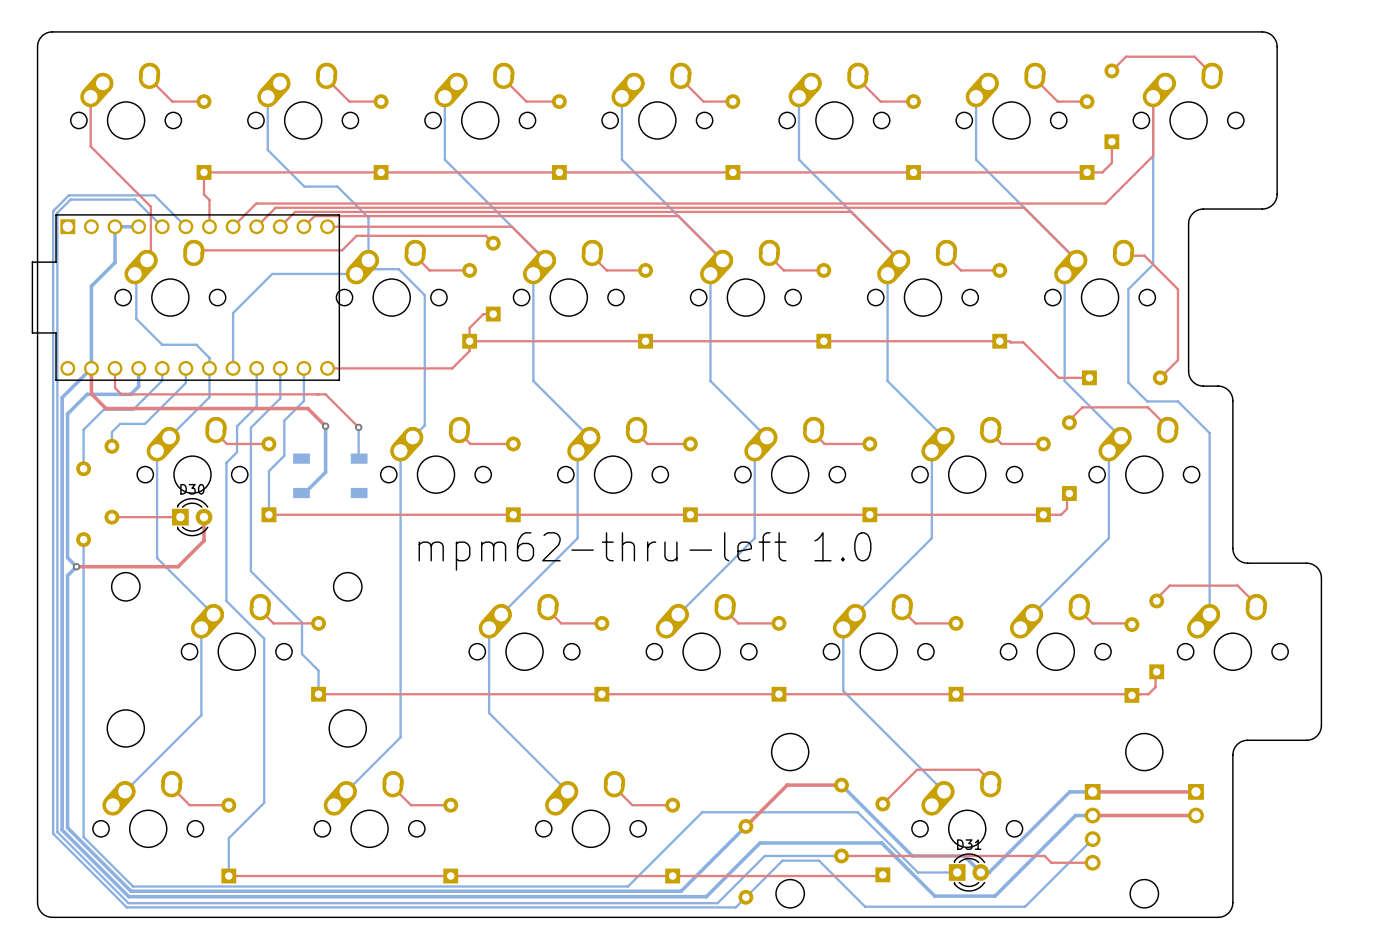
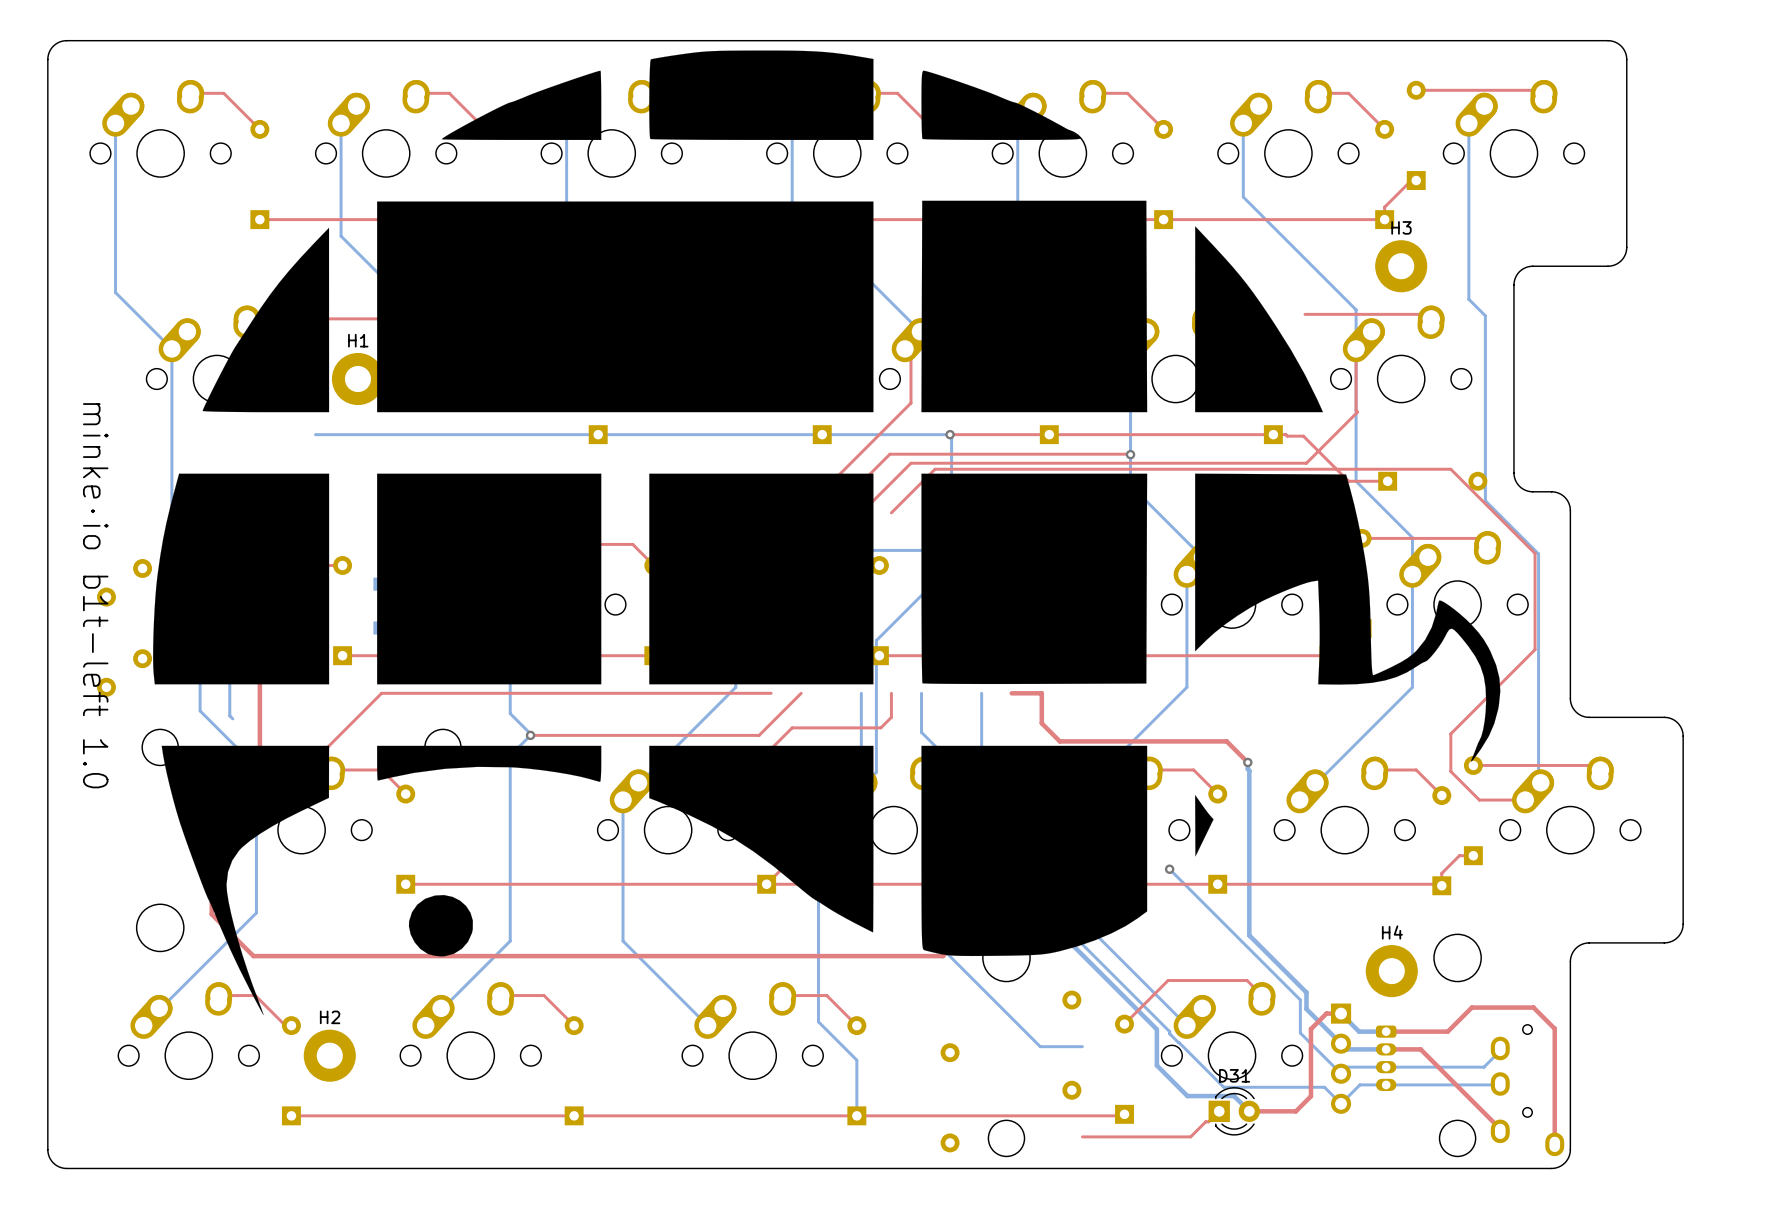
drawing: none -> [153, 50, 1501, 1016]
top track: (1111, 70) (1126, 56) (1194, 56) (1211, 74) (1211, 78) -> (1416, 90) (1541, 90) (1544, 93)
top track: (149, 78) (172, 101) (204, 101) -> (190, 93) (223, 93) (259, 129)
top track: (326, 78) (349, 101) (381, 101) -> (416, 93) (449, 93) (485, 129)
top track: (680, 78) (703, 101) (732, 101) -> (867, 93) (897, 93) (933, 129)
top track: (857, 78) (880, 101) (913, 101) -> (1092, 93) (1127, 93) (1163, 129)
top track: (1034, 78) (1057, 101) (1087, 101) -> (1318, 93) (1348, 93) (1384, 129)
top track: (90, 96) (90, 146) (150, 206) (150, 256) (147, 260) -> none
top track: (1153, 96) (1153, 155) (1105, 203) (256, 203) (233, 226) -> none
top track: (1111, 141) (1111, 162) (1102, 172) (1087, 172) -> (1416, 180) (1411, 180) (1384, 207) (1384, 219)
bottom track: (267, 149) (304, 186) (337, 186) (368, 217) (368, 260) -> (341, 191) (341, 236) (453, 348)
bottom track: (976, 154) (976, 159) (1076, 260) -> (1243, 197) (1356, 309) (1356, 348)
top track: (204, 172) (204, 194) (209, 200) (209, 226) -> none
H3: none -> (1401, 266)
bottom track: (138, 226) (115, 226) (115, 262) (91, 286) (91, 368) (62, 397) (62, 830) (128, 896) (706, 896) (760, 842) (881, 842) (934, 896) (994, 896) (1075, 815) (1092, 815) -> none
bottom track: (162, 226) (135, 199) (70, 199) (57, 212) (57, 832) (128, 903) (717, 903) (764, 855) (841, 855) -> none
bottom track: (185, 226) (154, 195) (68, 195) (53, 211) (53, 833) (126, 907) (735, 907) (782, 860) (819, 860) (865, 906) (1025, 906) (1092, 839) -> none
top track: (256, 226) (275, 207) (1024, 207) (1076, 260) -> none
top track: (280, 226) (295, 211) (851, 211) (899, 260) -> none
top track: (303, 226) (314, 216) (678, 216) (722, 260) -> none
top track: (327, 226) (511, 226) (545, 260) -> none
bottom track: (1153, 234) (1153, 264) (1128, 289) (1128, 382) (1147, 401) (1177, 401) (1209, 433) (1209, 615) (1207, 617) -> (1468, 299) (1485, 315) (1485, 500) (1538, 553) (1538, 786)
top track: none -> (1304, 314) (1426, 314) (1431, 318)
top track: (1123, 255) (1144, 255) (1177, 289) (1177, 360) (1160, 377) -> none
bottom track: (134, 273) (136, 318) (162, 344) (196, 344) (209, 357) (209, 397) (157, 451) -> (115, 123) (115, 292) (171, 348) (171, 546) (200, 574)
bottom track: (533, 273) (533, 381) (589, 437) -> none
bottom track: (710, 273) (710, 381) (766, 437) -> none
top track: none -> (904, 348) (910, 354) (910, 403) (801, 512)
top track: none -> (1356, 348) (1357, 412) (1306, 463) (910, 463) (861, 512)
part: (185, 297) -> none
H1: none -> (357, 379)
top track: (493, 314) (483, 314) (469, 327) (469, 351) (452, 368) (327, 368) -> none
bottom track: none -> (315, 434) (950, 434) (951, 512)
top track: (469, 341) (745, 341) -> none
via: none -> (950, 434)
top track: none -> (1130, 454) (889, 454) (831, 512)
via: none -> (1130, 454)
top track: (91, 368) (91, 393) (106, 408) (307, 408) (325, 426) -> none
top track: (115, 368) (115, 388) (121, 394) (325, 394) (358, 427) -> none
bottom track: (138, 368) (138, 386) (130, 394) (87, 394) (67, 413) (67, 557) (76, 566) (67, 575) (67, 827) (131, 891) (681, 891) (745, 826) -> none
bottom track: (162, 368) (162, 380) (133, 409) (103, 409) (83, 429) (83, 468) -> none
bottom track: (185, 368) (185, 382) (144, 423) (120, 423) (111, 432) (111, 446) -> none
bottom track: (233, 368) (233, 313) (272, 273) (356, 273) (361, 269) (398, 269) (424, 295) (424, 425) (400, 451) -> none
bottom track: (256, 368) (256, 406) (237, 426) (237, 452) (226, 462) (226, 600) (264, 638) (264, 802) (228, 838) (228, 876) -> none
bottom track: (280, 368) (280, 398) (250, 427) (250, 571) (302, 622) (302, 654) (318, 670) (318, 694) -> none
bottom track: (303, 368) (303, 401) (284, 420) (284, 455) (268, 471) (268, 514) -> none
bottom track: (1064, 377) (1064, 381) (1121, 437) -> (1356, 481) (1412, 537) (1412, 574)
top track: none -> (891, 512) (935, 469) (1450, 469) (1535, 553) (1535, 649) (1450, 733) (1450, 771) (1479, 800) (1525, 800)
top track: (1067, 422) (1082, 407) (1147, 407) (1163, 422) -> (1362, 538) (1481, 538)
via: (325, 426) -> none
via: (358, 427) -> none
top track: (459, 432) (470, 443) (513, 443) -> (585, 544) (632, 544) (653, 565)
top track: (636, 432) (647, 443) (690, 443) -> none
top track: (813, 432) (824, 443) (869, 443) -> none
top track: (990, 432) (1001, 443) (1044, 443) -> none
bottom track: (754, 451) (754, 538) (666, 628) -> (801, 512) (814, 526) (820, 526) (844, 550) (937, 550) (961, 574) (942, 574) (876, 640) (876, 772) (848, 800)
text: none -> minke·io b1t-left 1.0 (95, 595)
top track: (111, 517) (180, 517) -> none
bottom track: none -> (229, 658) (229, 715) (232, 718)
bottom track: (577, 538) (501, 614) -> (735, 685) (623, 800)
bottom track: (931, 538) (855, 614) -> (1186, 685) (1074, 800)
bottom track: (1108, 538) (1032, 614) -> (1412, 685) (1299, 800)
bottom track: (83, 539) (83, 837) (133, 886) (628, 886) (702, 812) (857, 812) (917, 872) (957, 872) -> none
top track: (204, 540) (178, 566) (76, 566) -> (259, 688) (259, 747) (211, 795) (211, 914) (253, 956) (942, 956) (990, 908)
top track: none -> (771, 693) (381, 693) (275, 800) (256, 800)
top track: none -> (801, 693) (759, 735) (530, 735)
bottom track: none -> (861, 693) (861, 747) (818, 790) (818, 1021) (856, 1060) (856, 1115)
top track: none -> (891, 693) (891, 717) (880, 727) (792, 727) (771, 748) (771, 766) (796, 792) (796, 855) (766, 884)
bottom track: none -> (921, 693) (921, 732) (946, 757) (946, 782) (933, 795) (933, 939) (1040, 1046) (1082, 1046)
bottom track: none -> (981, 693) (981, 775) (1025, 818) (1025, 887) (1223, 1087) (1324, 1087) (1341, 1103) (1359, 1084) (1500, 1083)
top track: none -> (1011, 693) (1041, 693) (1041, 723) (1059, 741) (1226, 741) (1247, 762)
text: mpm62-thru-left 1.0 (645, 551) -> none
bottom track: (400, 560) (400, 593) -> (510, 713) (532, 735) (510, 755)
via: (76, 566) -> none
via: none -> (530, 735)
bottom track: none -> (1247, 762) (1249, 935) (1306, 992) (1306, 1009) (1346, 1049) (1380, 1049)
via: none -> (1247, 762)
top track: (1155, 599) (1169, 585) (1237, 585) (1252, 600) -> (1473, 765) (1595, 765)
top track: none -> (1374, 769) (1416, 769) (1441, 795)
top track: (260, 609) (273, 623) (318, 623) -> (331, 769) (381, 769) (405, 794)
top track: (724, 609) (738, 623) (778, 623) -> none
top track: (901, 609) (915, 623) (956, 623) -> (1149, 769) (1193, 769) (1217, 794)
top track: (1079, 609) (1092, 623) (1133, 623) -> none
top track: (1155, 670) (1155, 687) (1148, 694) (1130, 694) -> (1473, 855) (1459, 855) (1441, 873) (1441, 885) (1440, 884)
bottom track: none -> (1169, 869) (1300, 999) (1300, 1033) (1341, 1073) (1347, 1067) (1483, 1067) (1500, 1050) (1500, 1048)
via: none -> (1169, 869)
bottom track: (843, 690) (944, 791) -> (1074, 880) (1074, 912) (1186, 1025)
bottom track: (489, 713) (567, 791) -> (623, 908) (623, 941) (707, 1025)
bottom track: (201, 715) (124, 791) -> (256, 911) (143, 1025)
bottom track: (400, 737) (346, 791) -> (510, 939) (425, 1025)
H4: none -> (1391, 971)
part footprint: [1084, 784, 1101, 871] -> [1375, 1025, 1397, 1092]
bottom track: (841, 785) (912, 855) (964, 855) (968, 860) -> (950, 858) (950, 869) (989, 908) (1023, 908) (1028, 912) (1040, 912) (1156, 1029) (1156, 1065) (1187, 1096) (1234, 1096)
top track: (841, 785) (787, 785) (745, 826) -> none
top track: (171, 786) (189, 805) (224, 805) -> (218, 995) (255, 995) (285, 1025)
top track: (392, 786) (411, 805) (450, 805) -> (500, 995) (544, 995) (574, 1025)
top track: (614, 786) (632, 805) (672, 805) -> (782, 995) (826, 995) (856, 1025)
bottom track: (1092, 791) (1069, 791) (989, 872) (980, 872) -> none
top track: (1092, 791) (1195, 791) -> none
bottom track: none -> (1341, 1013) (1359, 1031) (1380, 1031)
top track: none -> (1341, 1013) (1326, 1013) (1310, 1029) (1310, 1096) (1295, 1111) (1249, 1111)
part: (1195, 803) -> none
top track: none -> (1380, 1031) (1447, 1031) (1471, 1007) (1533, 1007) (1554, 1028) (1554, 1144)
top track: (1092, 815) (1195, 815) -> none
top track: none -> (1380, 1049) (1420, 1049) (1500, 1128) (1500, 1131)
H2: none -> (329, 1055)
part: none -> (1341, 1058)
top track: (845, 852) (841, 855) (1044, 855) (1051, 862) (1092, 862) -> none
part: none -> (1527, 1090)
top track: none -> (1219, 1111) (1190, 1136) (1082, 1136)

